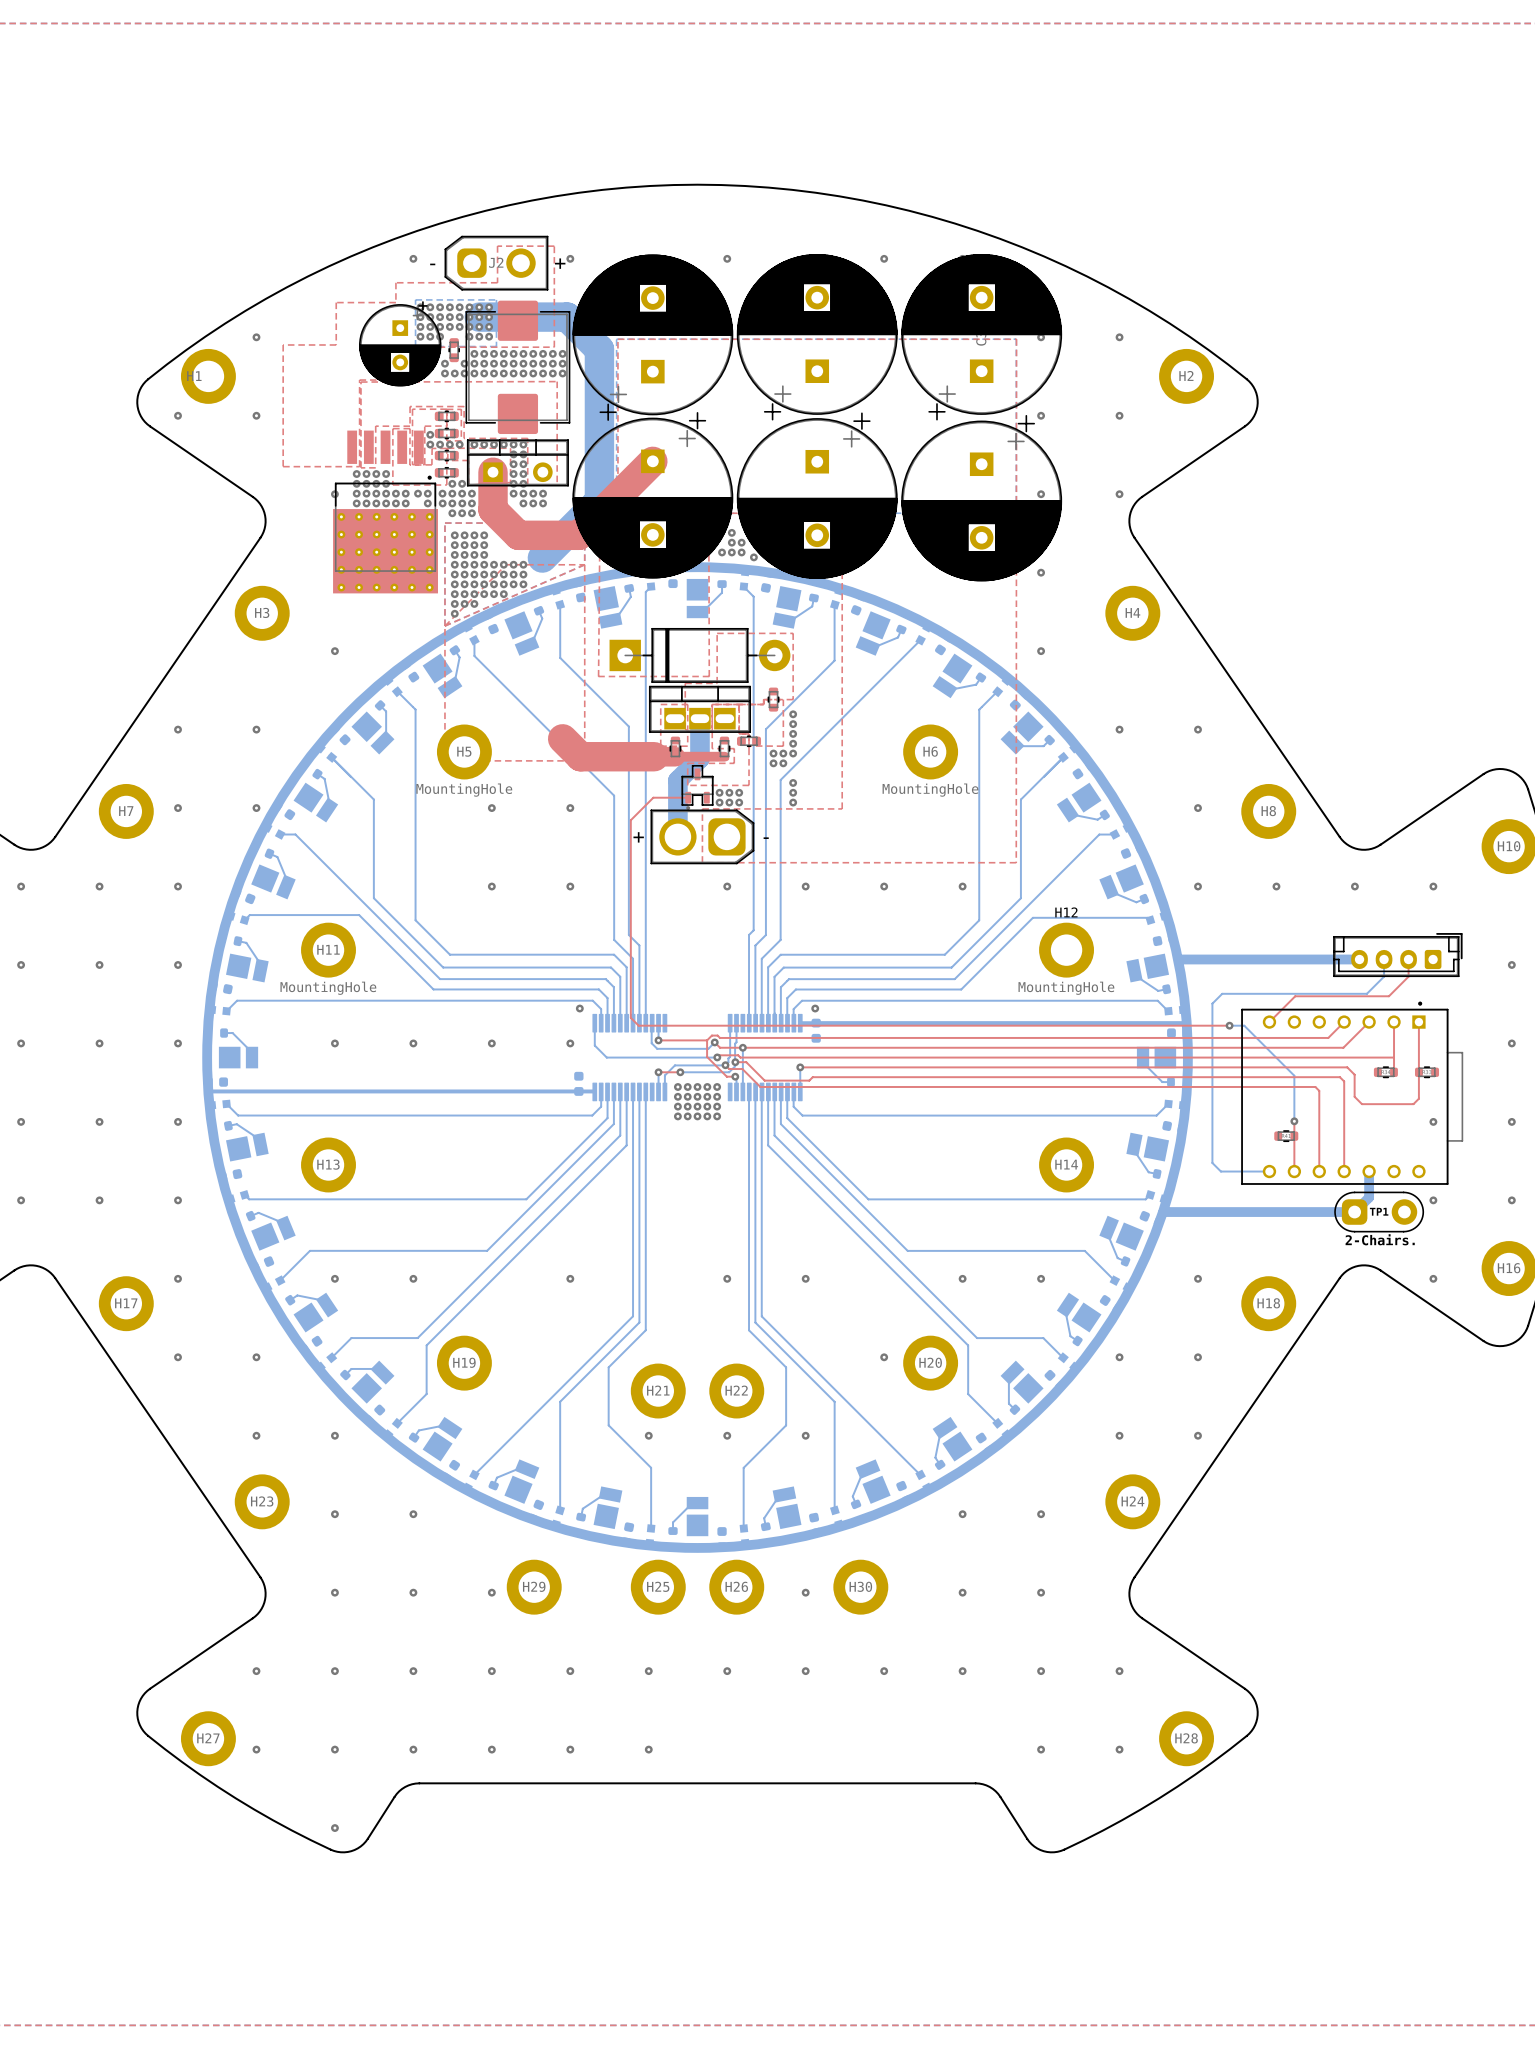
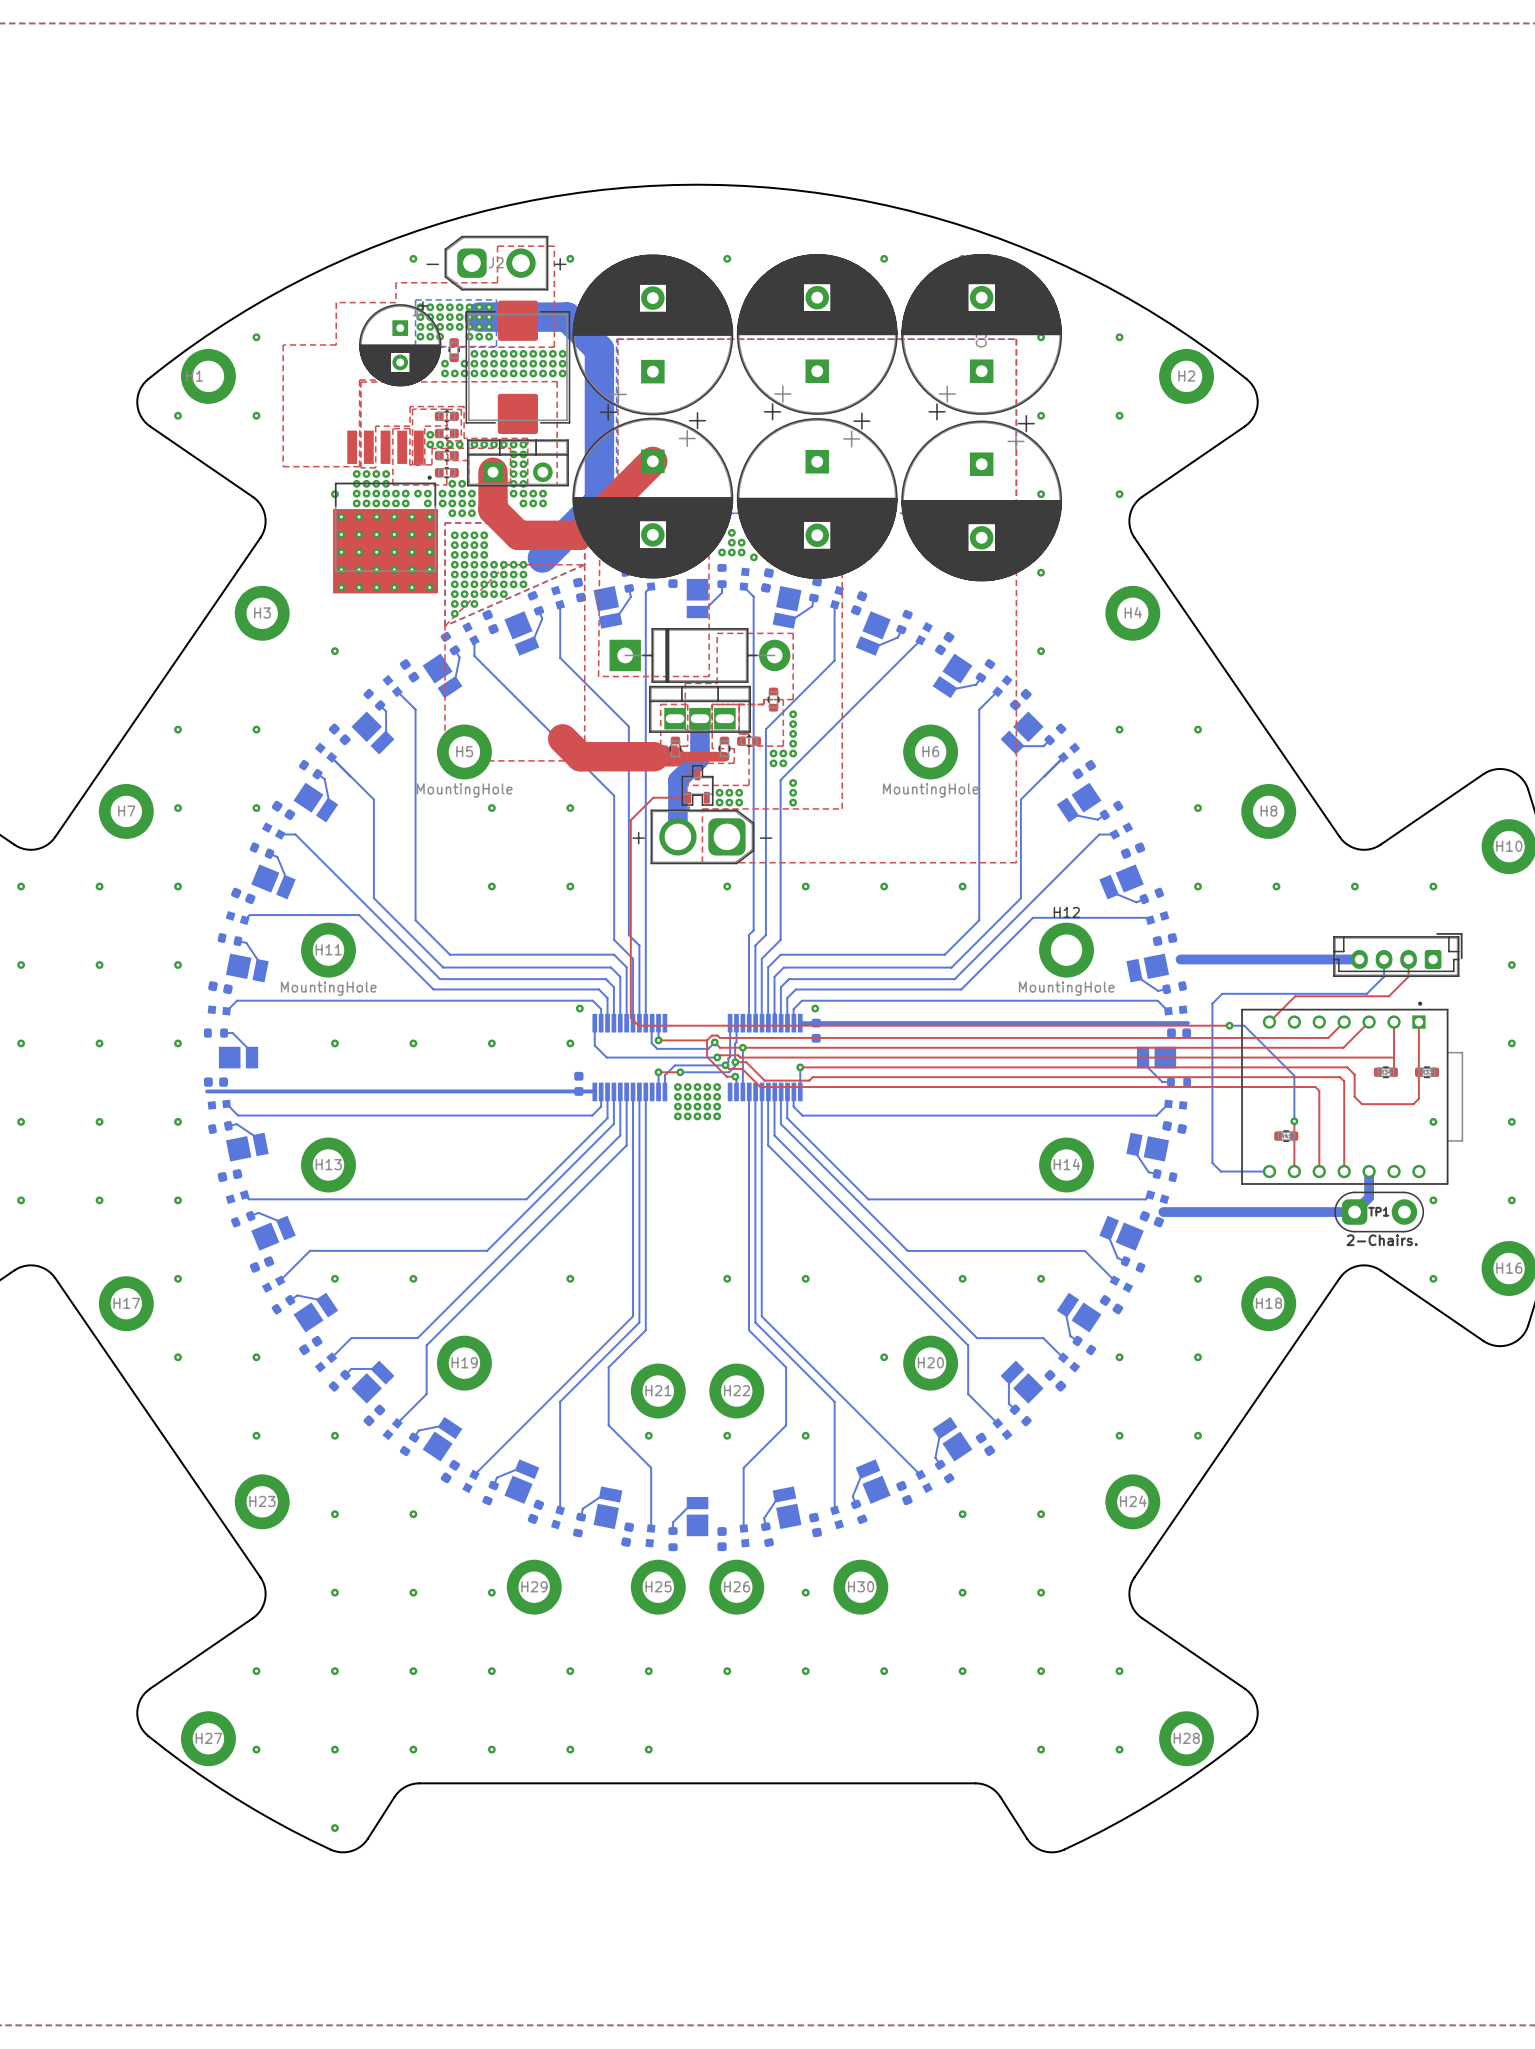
drawing: [202, 562, 1193, 1553] -> none

